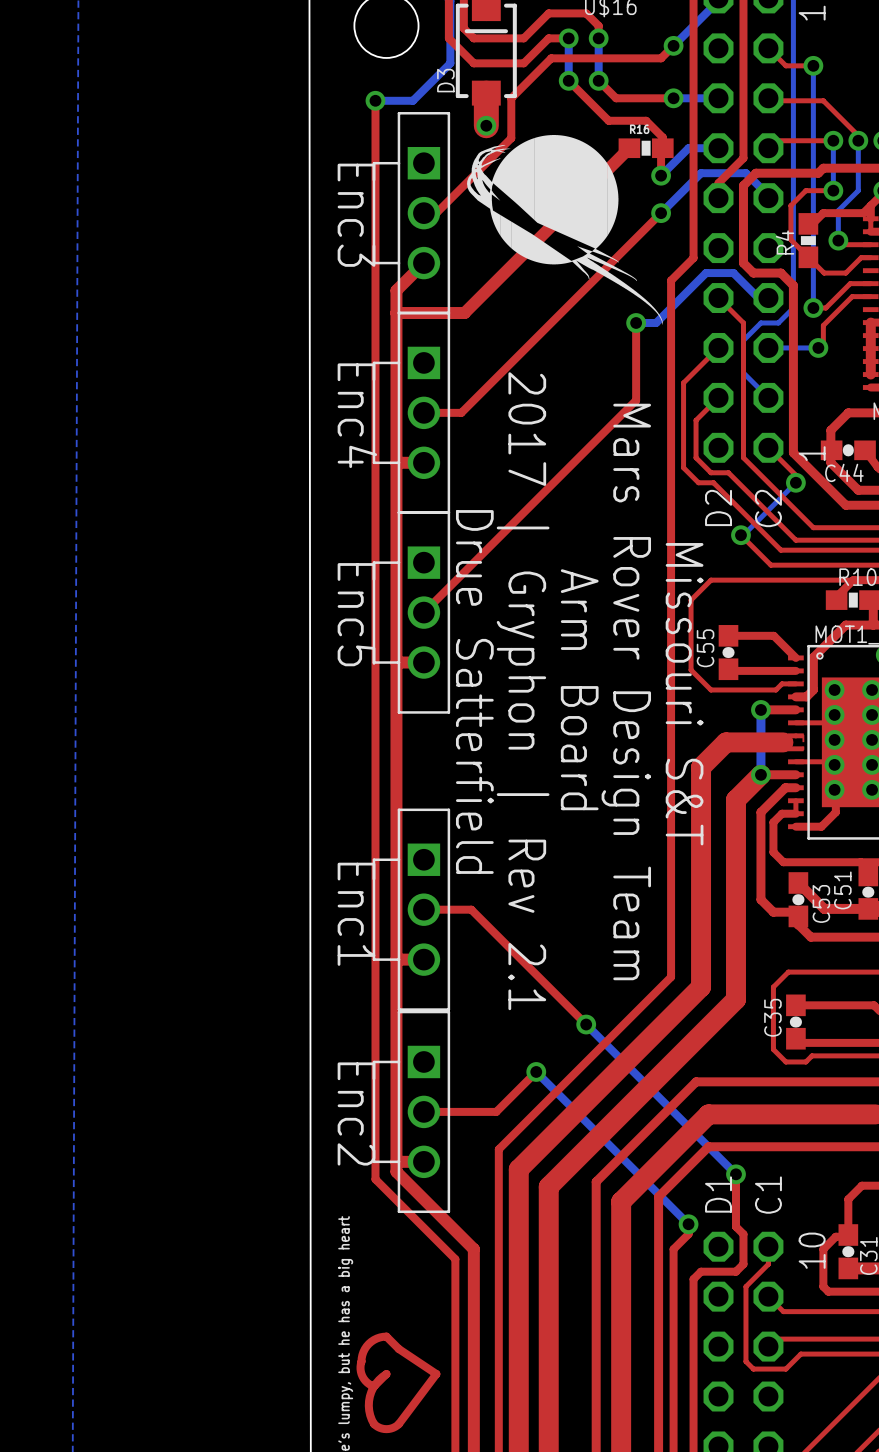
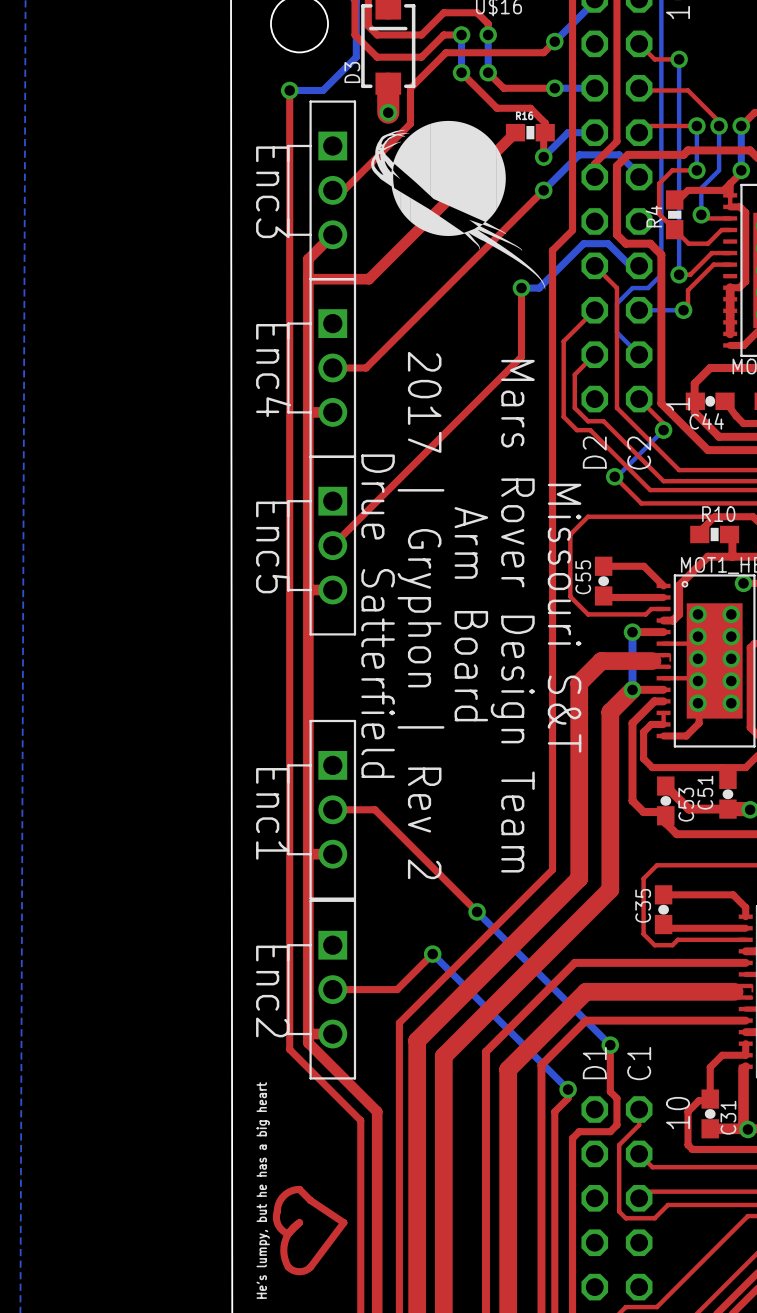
text: 2017 | Gryphon | Rev 2.1 (523, 691) -> 2017 | Gryphon | Rev 2 (421, 615)

